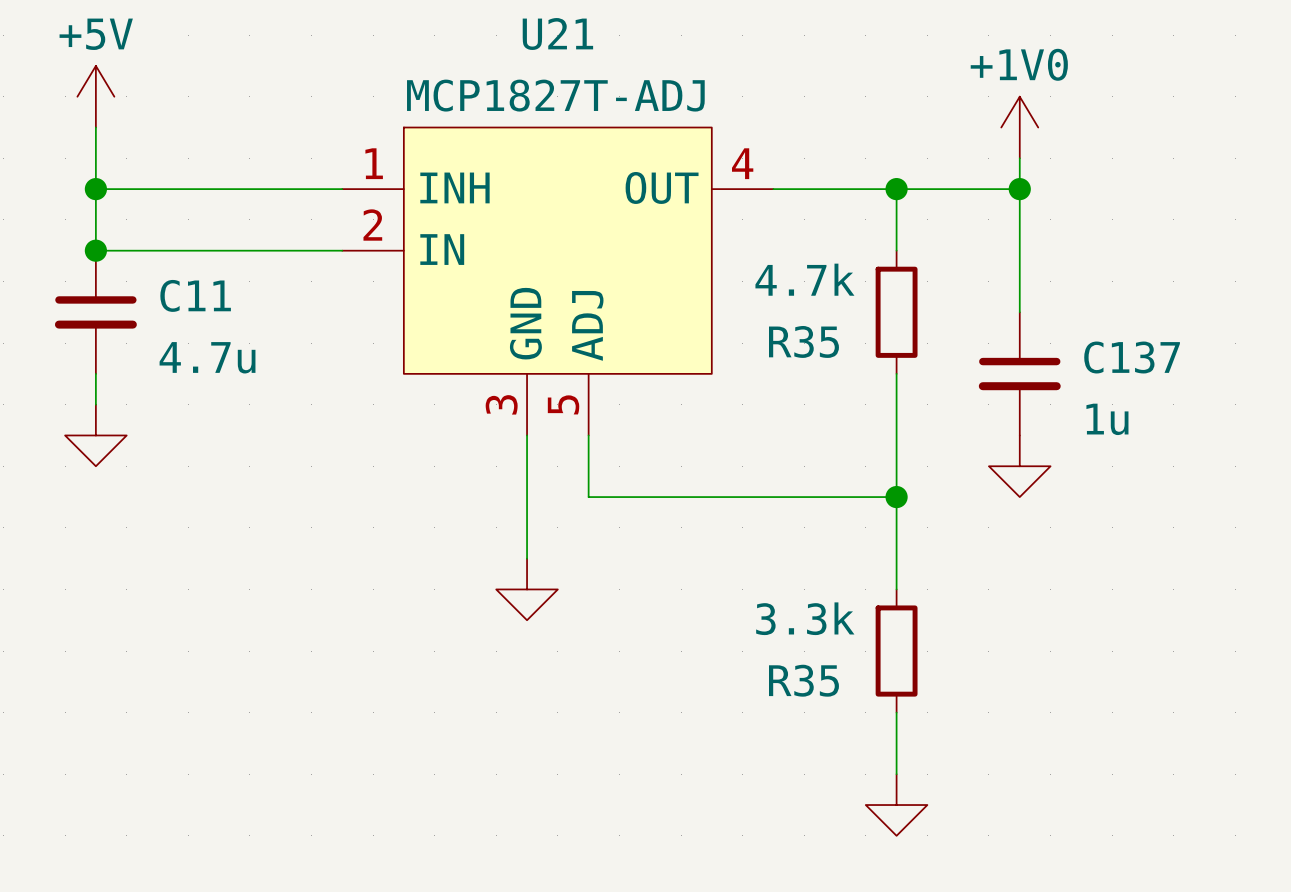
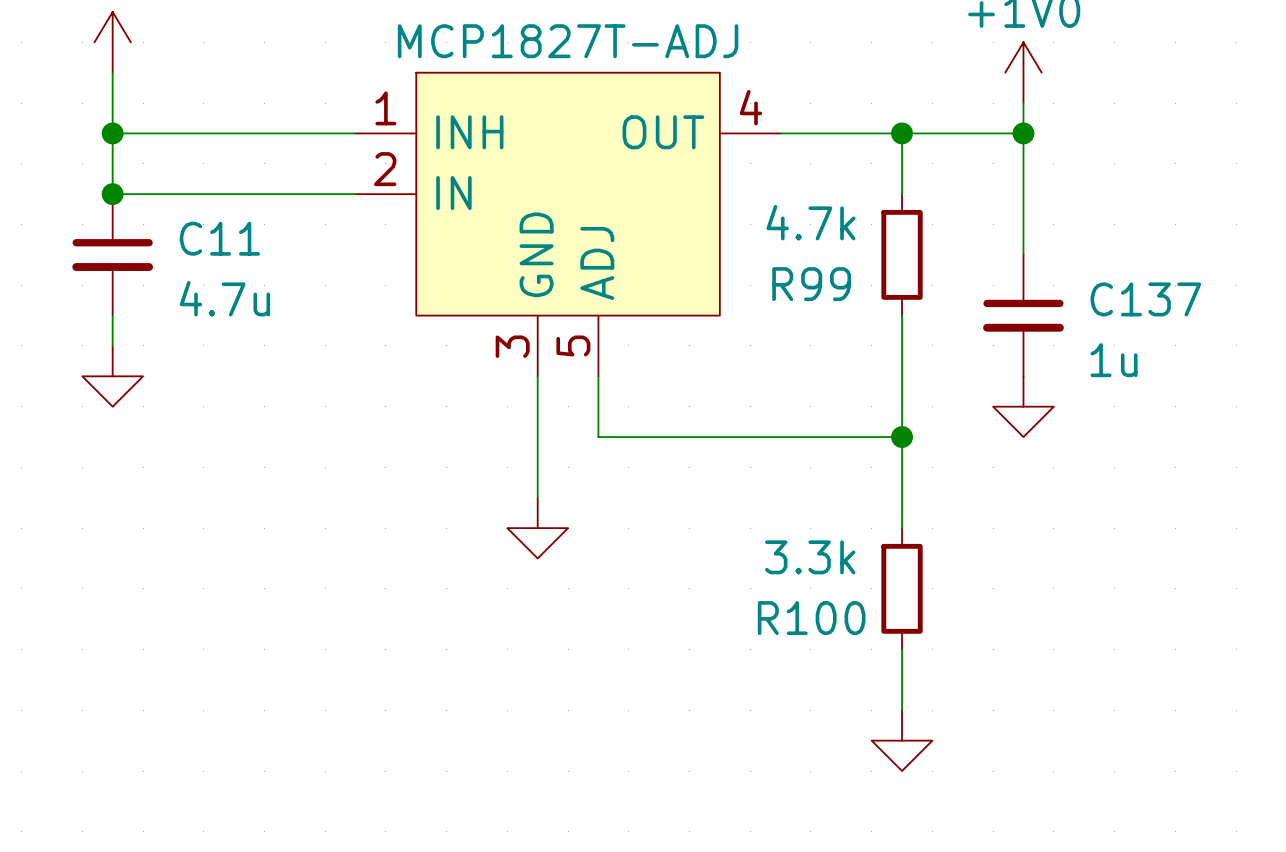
R35 name: R35 (803, 341) -> R99 (811, 284)
R35 name: R35 (803, 680) -> R100 (811, 618)

